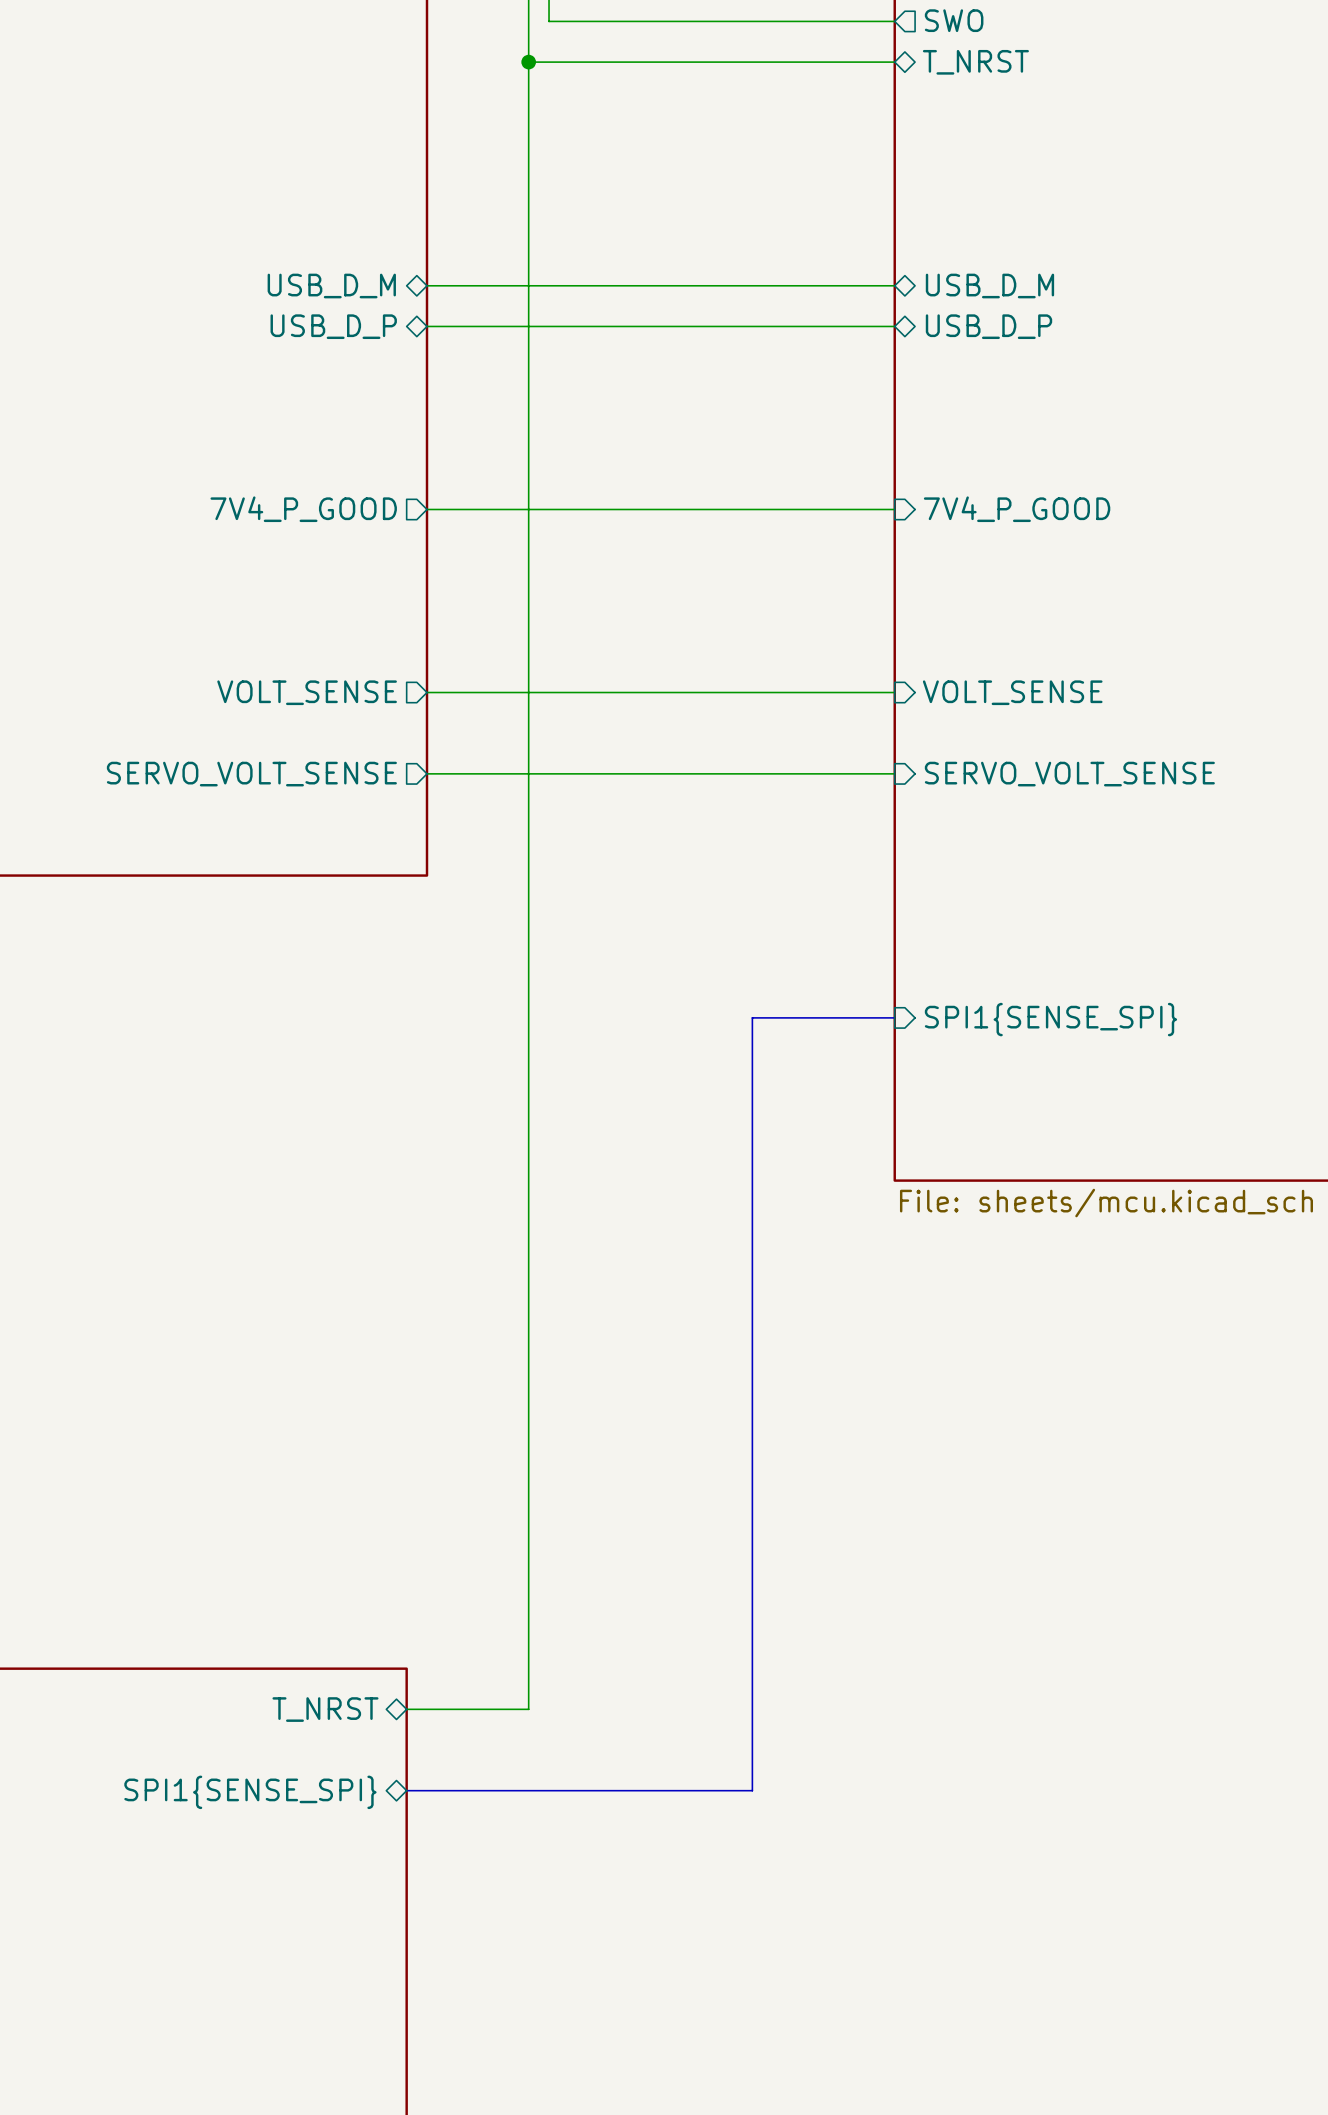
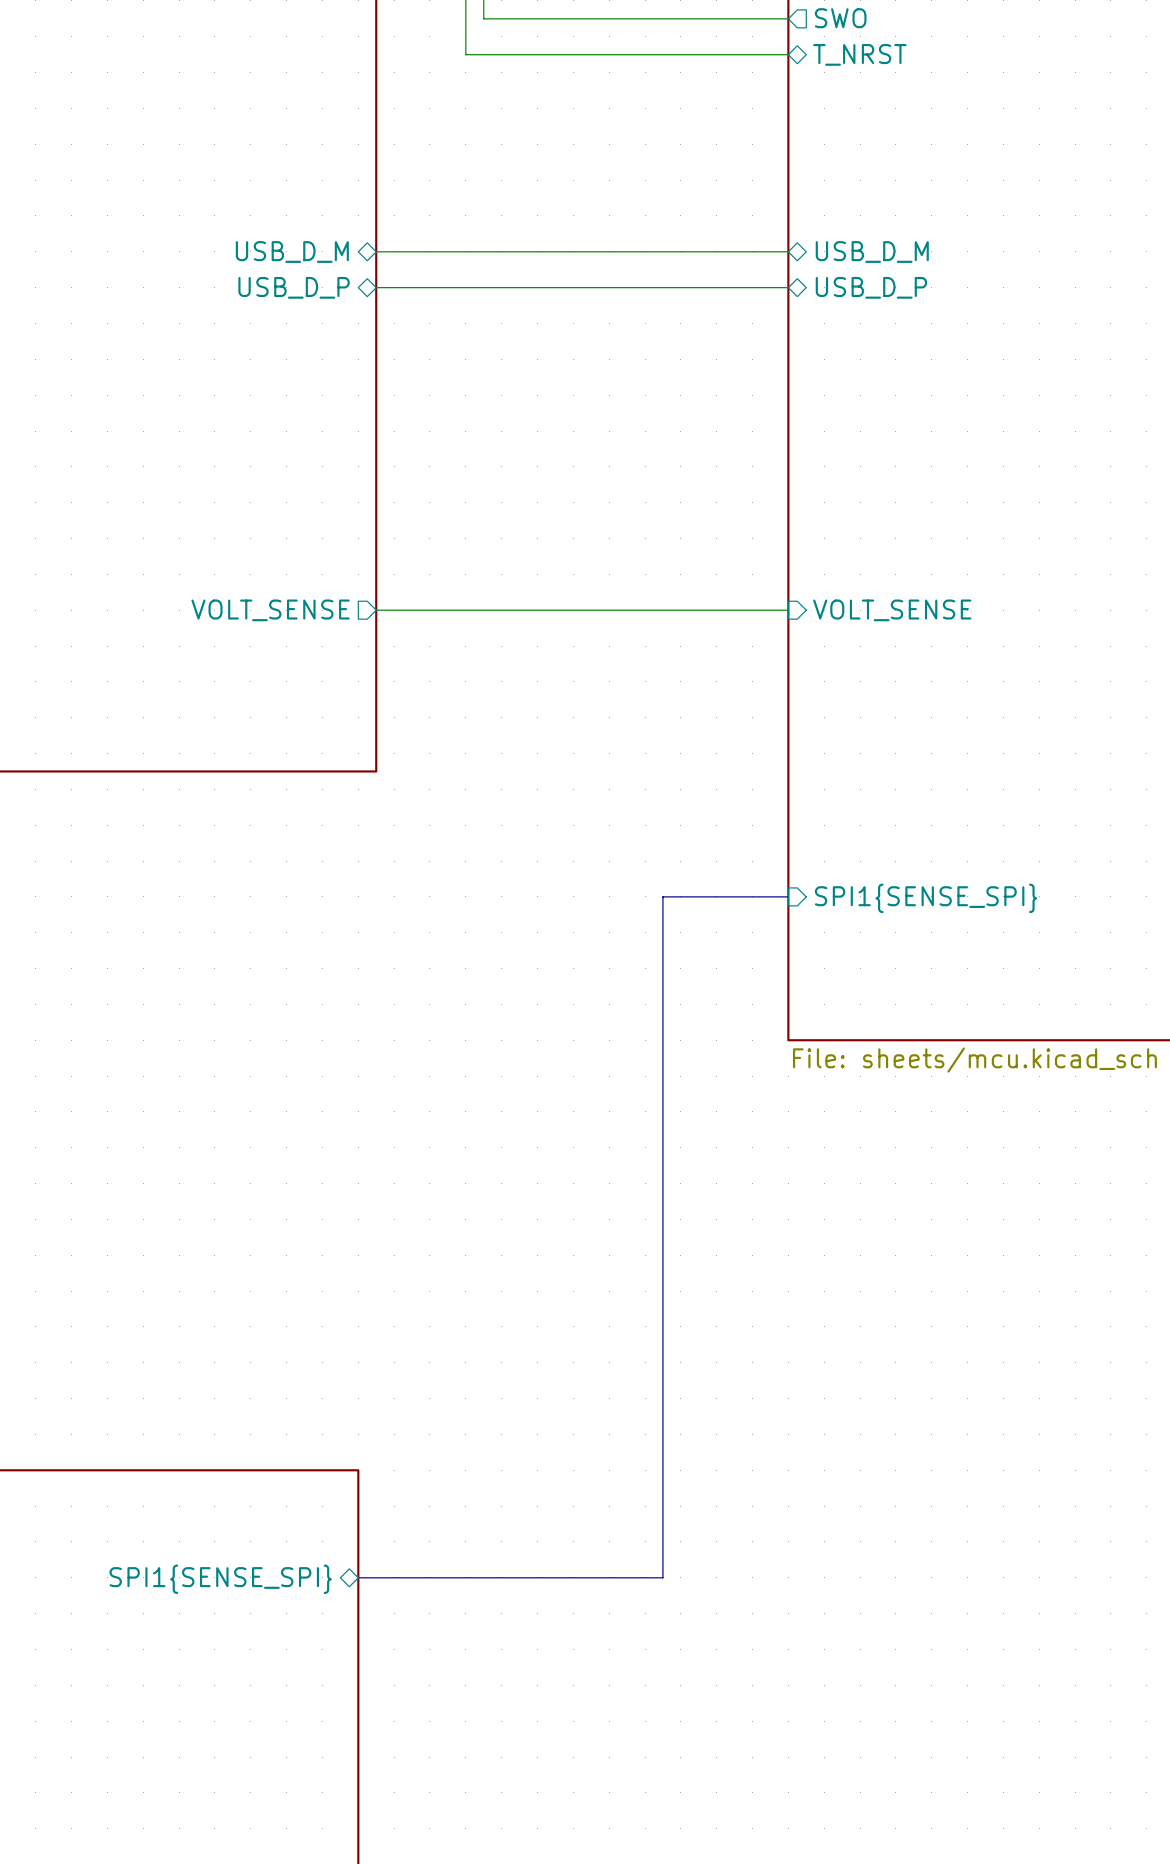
wire: (528, 62) (528, 1709) (406, 1709) -> none
junction: (528, 62) -> none
sheet pin: 7V4_P_GOOD (303, 509) -> none
wire: (427, 509) (894, 509) -> none
sheet pin: 7V4_P_GOOD (1017, 509) -> none
wire: (427, 773) (894, 773) -> none
sheet pin: SERVO_VOLT_SENSE (251, 774) -> none
sheet pin: SERVO_VOLT_SENSE (1069, 774) -> none
sheet pin: T_NRST (325, 1709) -> none

